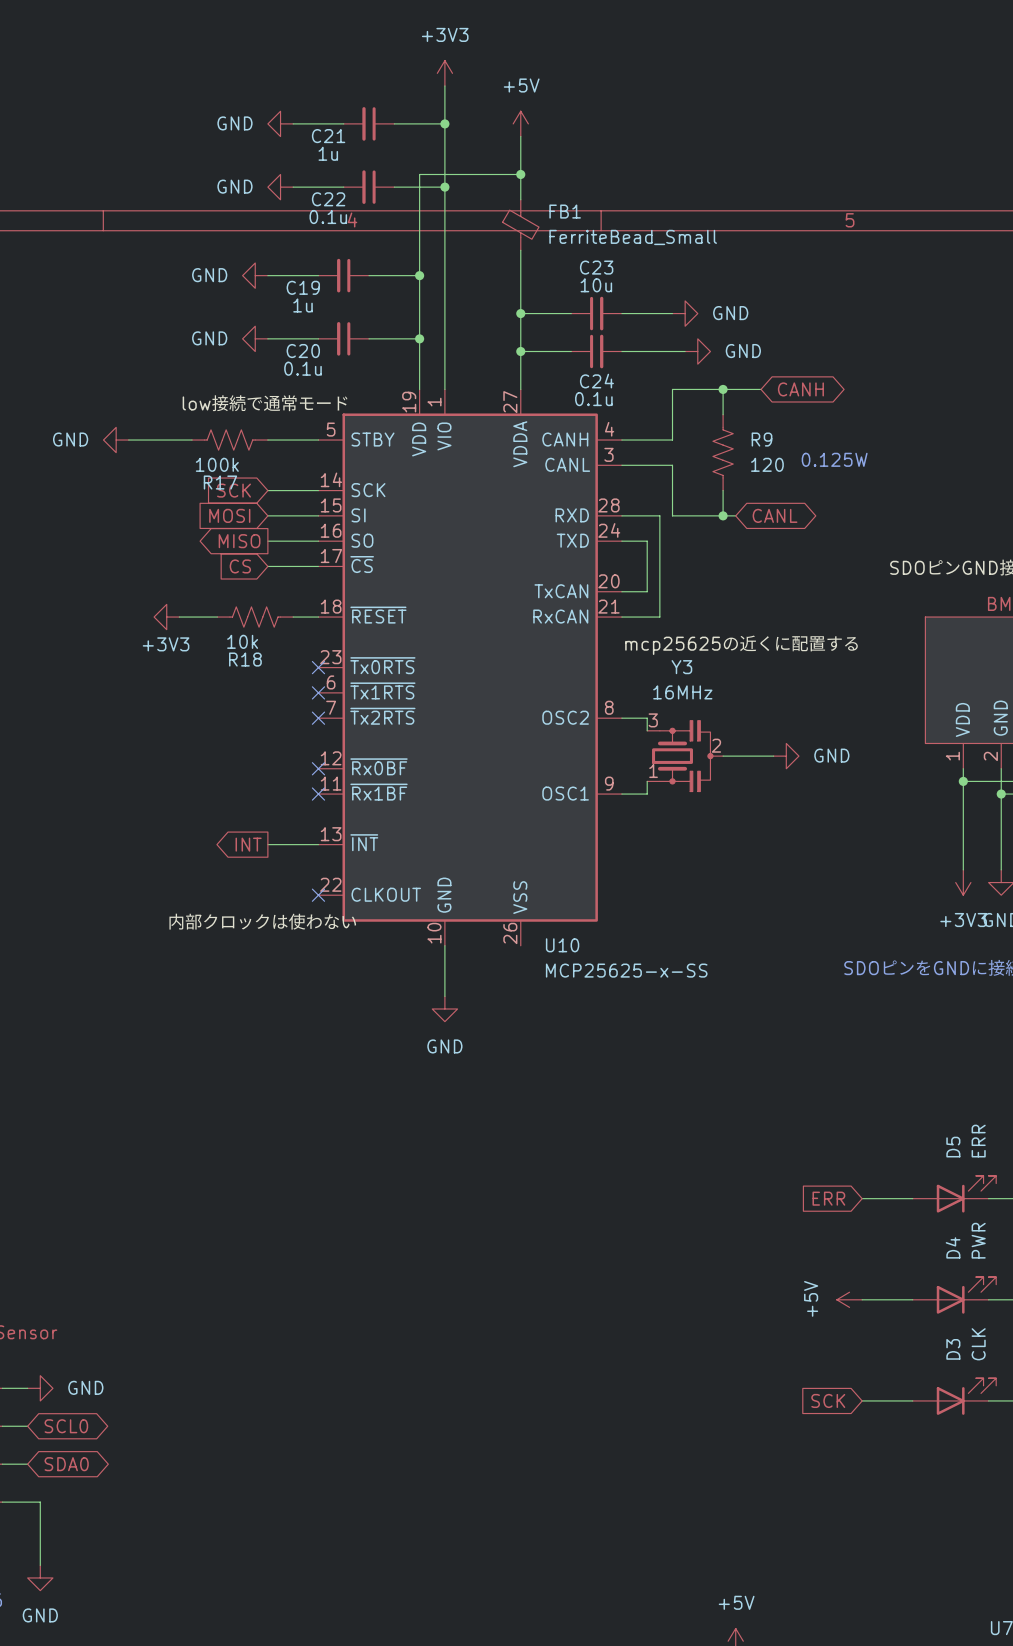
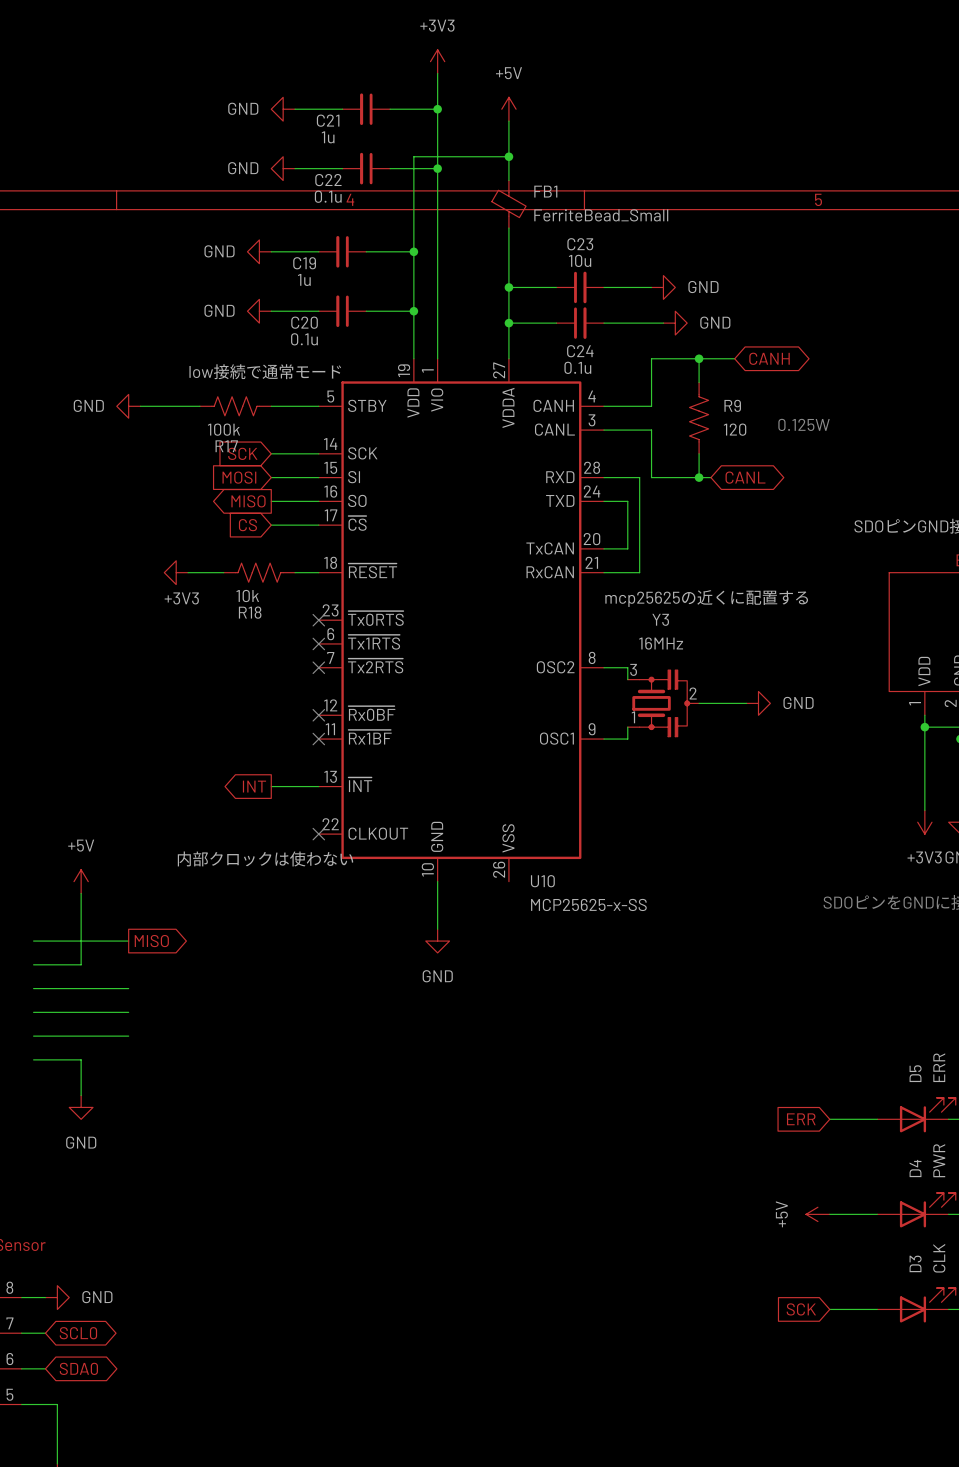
power symbol: none -> +5V (81, 881)
wire: none -> (81, 893) (81, 964) (33, 964)
wire: none -> (33, 941) (128, 941)
global label: none -> MISO (151, 941)
wire: none -> (33, 988) (128, 988)
wire: none -> (33, 1012) (128, 1012)
wire: none -> (33, 1036) (128, 1036)
wire: none -> (33, 1059) (81, 1059) (81, 1095)
power symbol: none -> GND (81, 1107)

